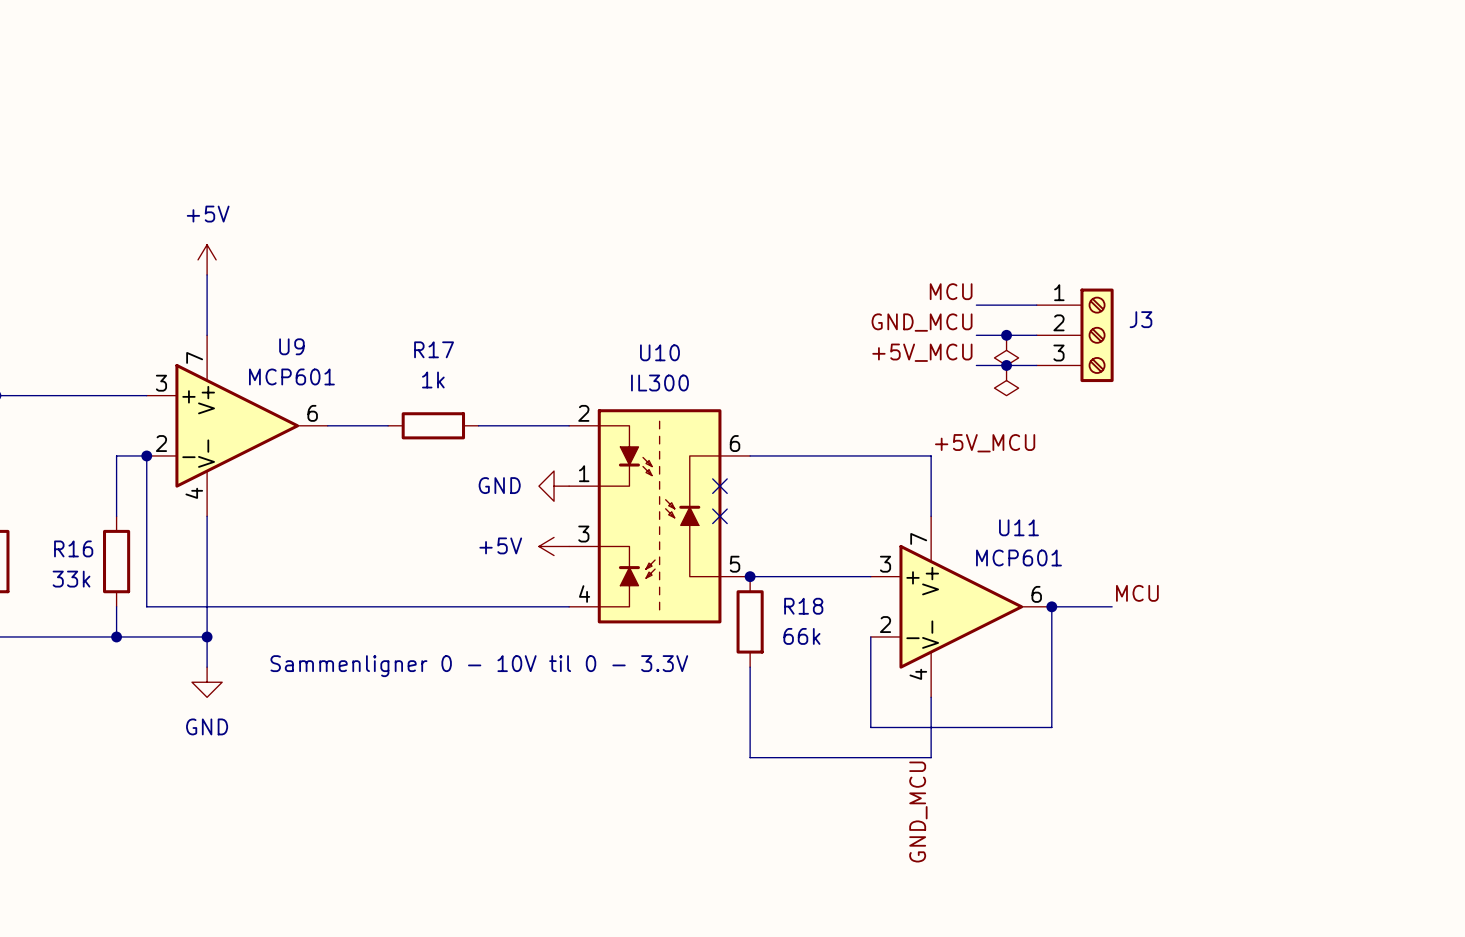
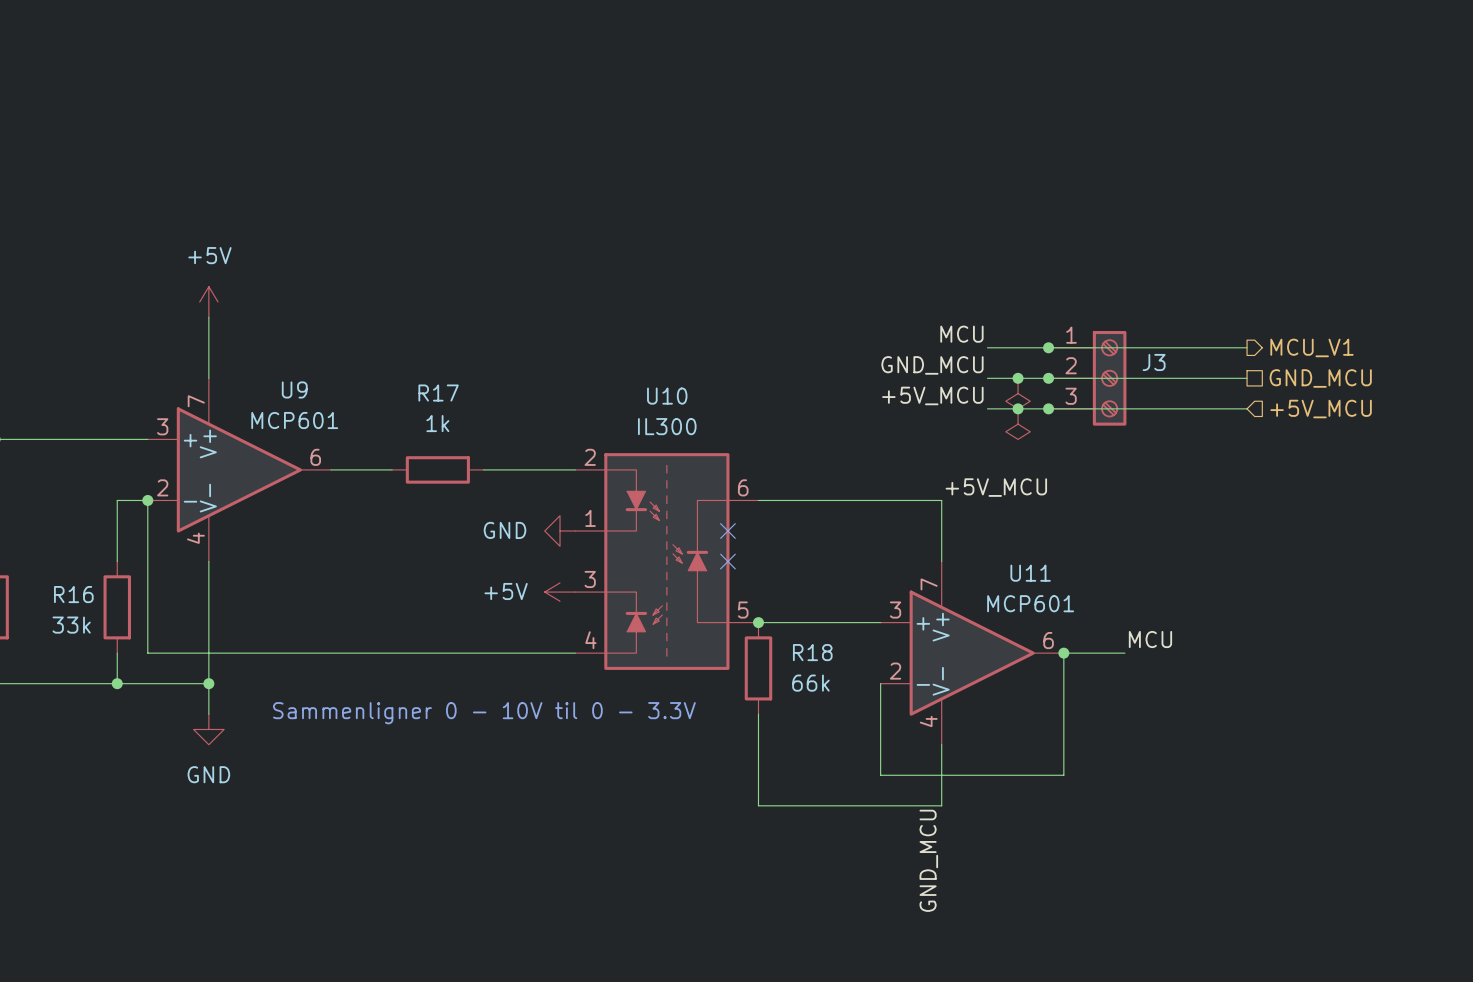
wire: none -> (1048, 347) (1247, 347)
junction: none -> (1048, 347)
hierarchical label: none -> MCU_V1 (1311, 347)
wire: none -> (1048, 378) (1247, 378)
junction: none -> (1048, 378)
hierarchical label: none -> GND_MCU (1320, 378)
wire: none -> (1048, 408) (1247, 408)
junction: none -> (1048, 408)
hierarchical label: none -> +5V_MCU (1321, 409)

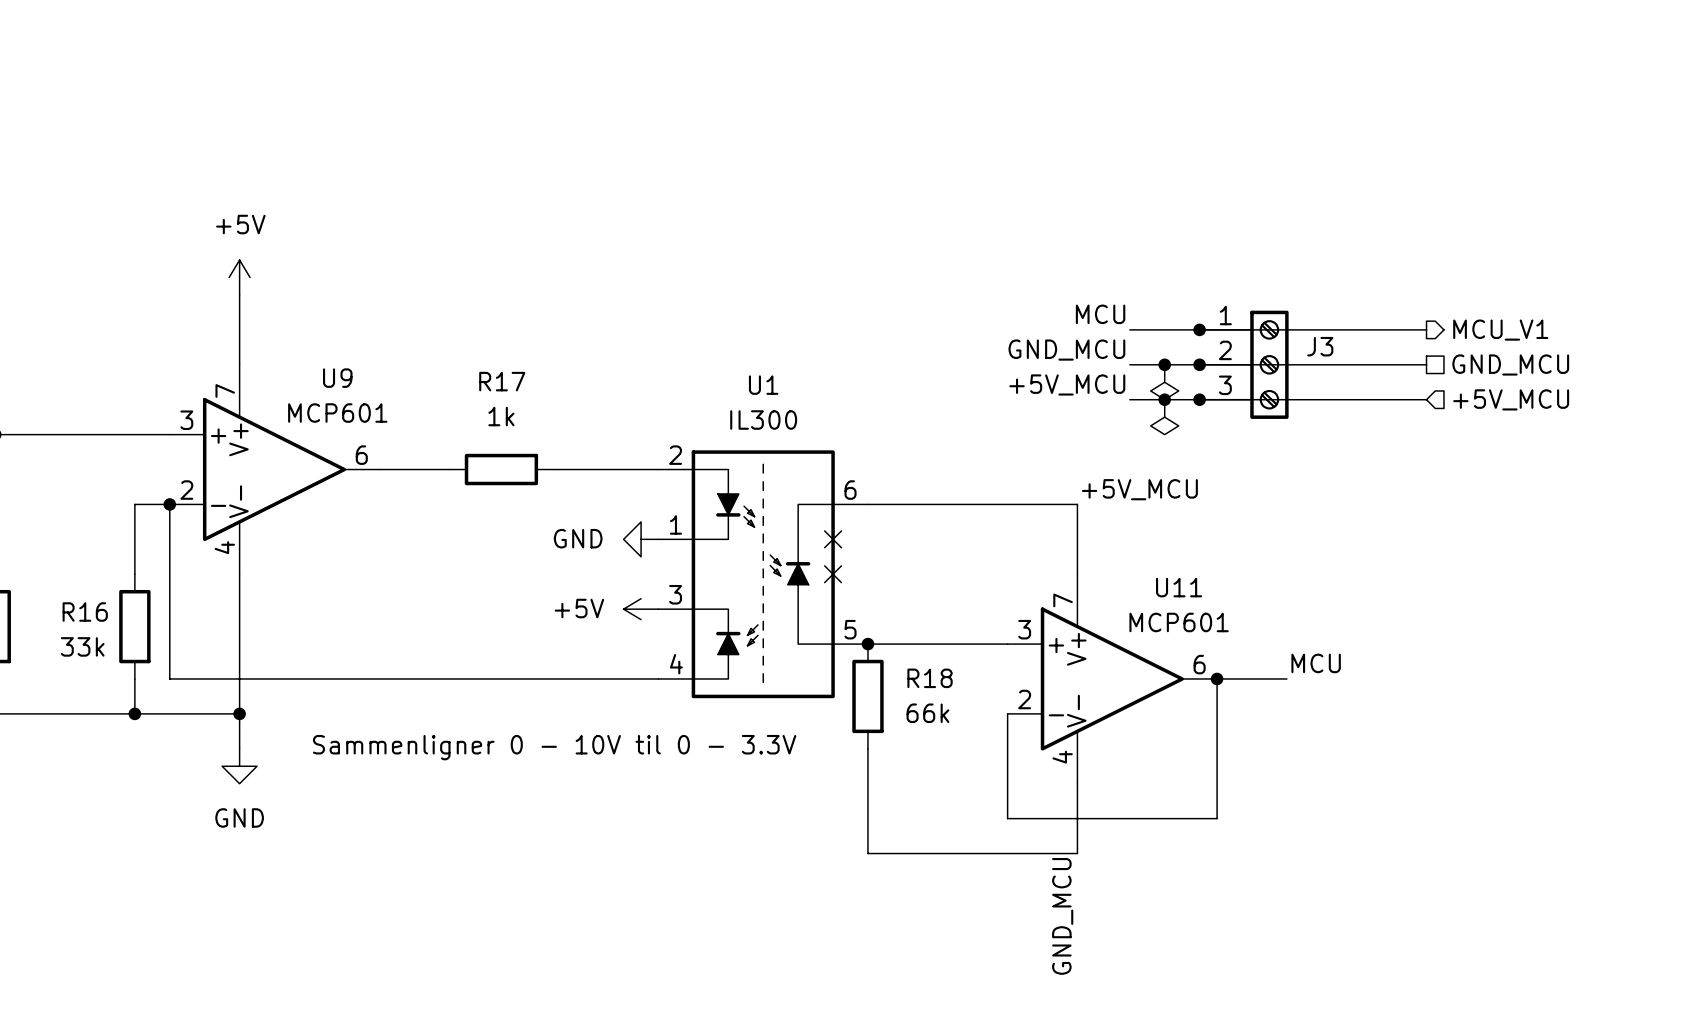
U10 name: U10 (667, 396) -> U1 (763, 385)

